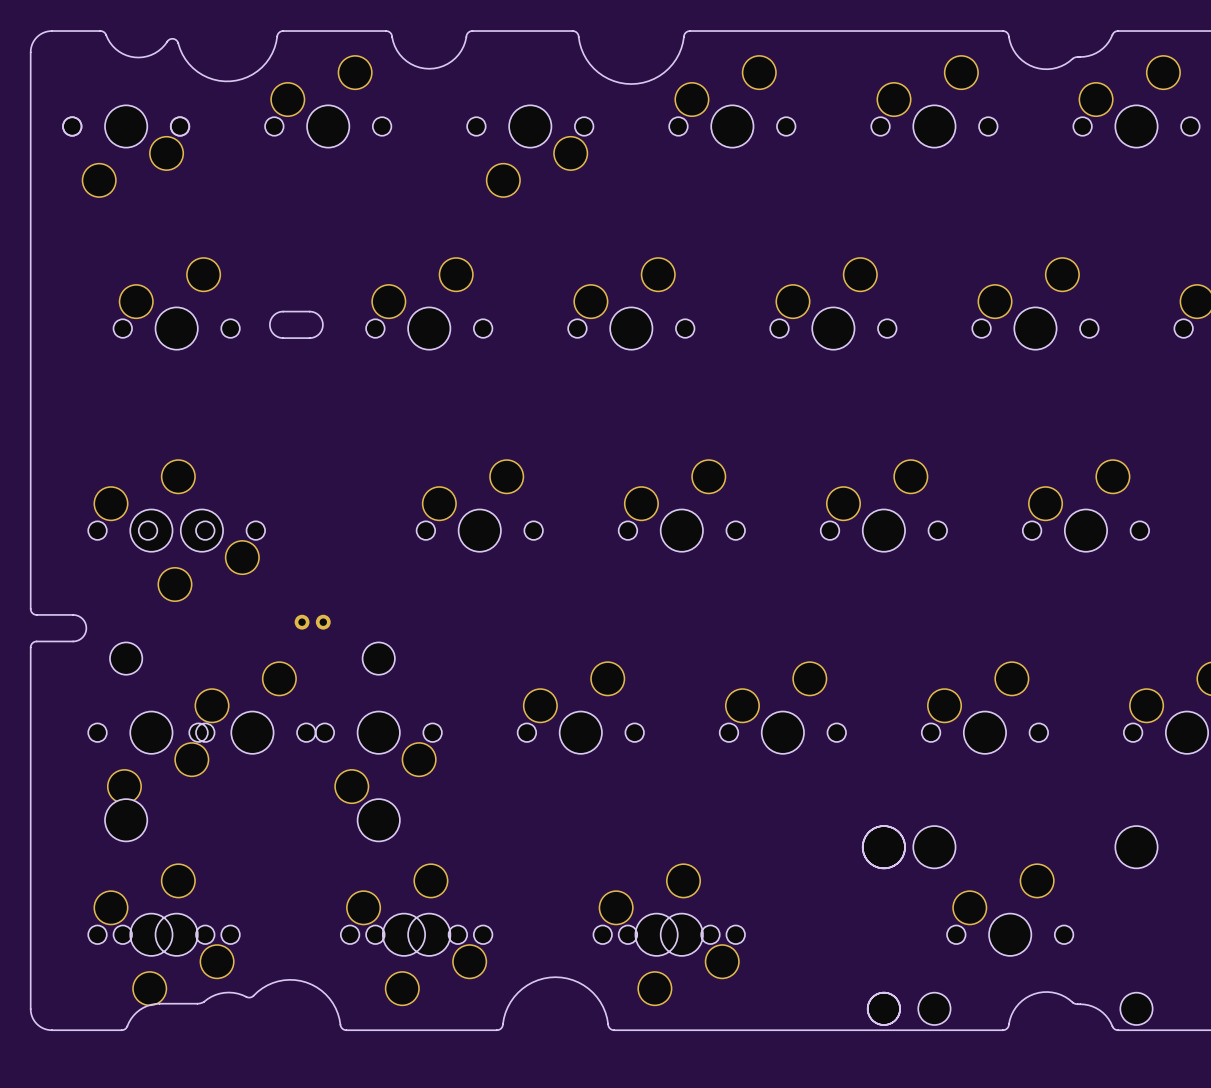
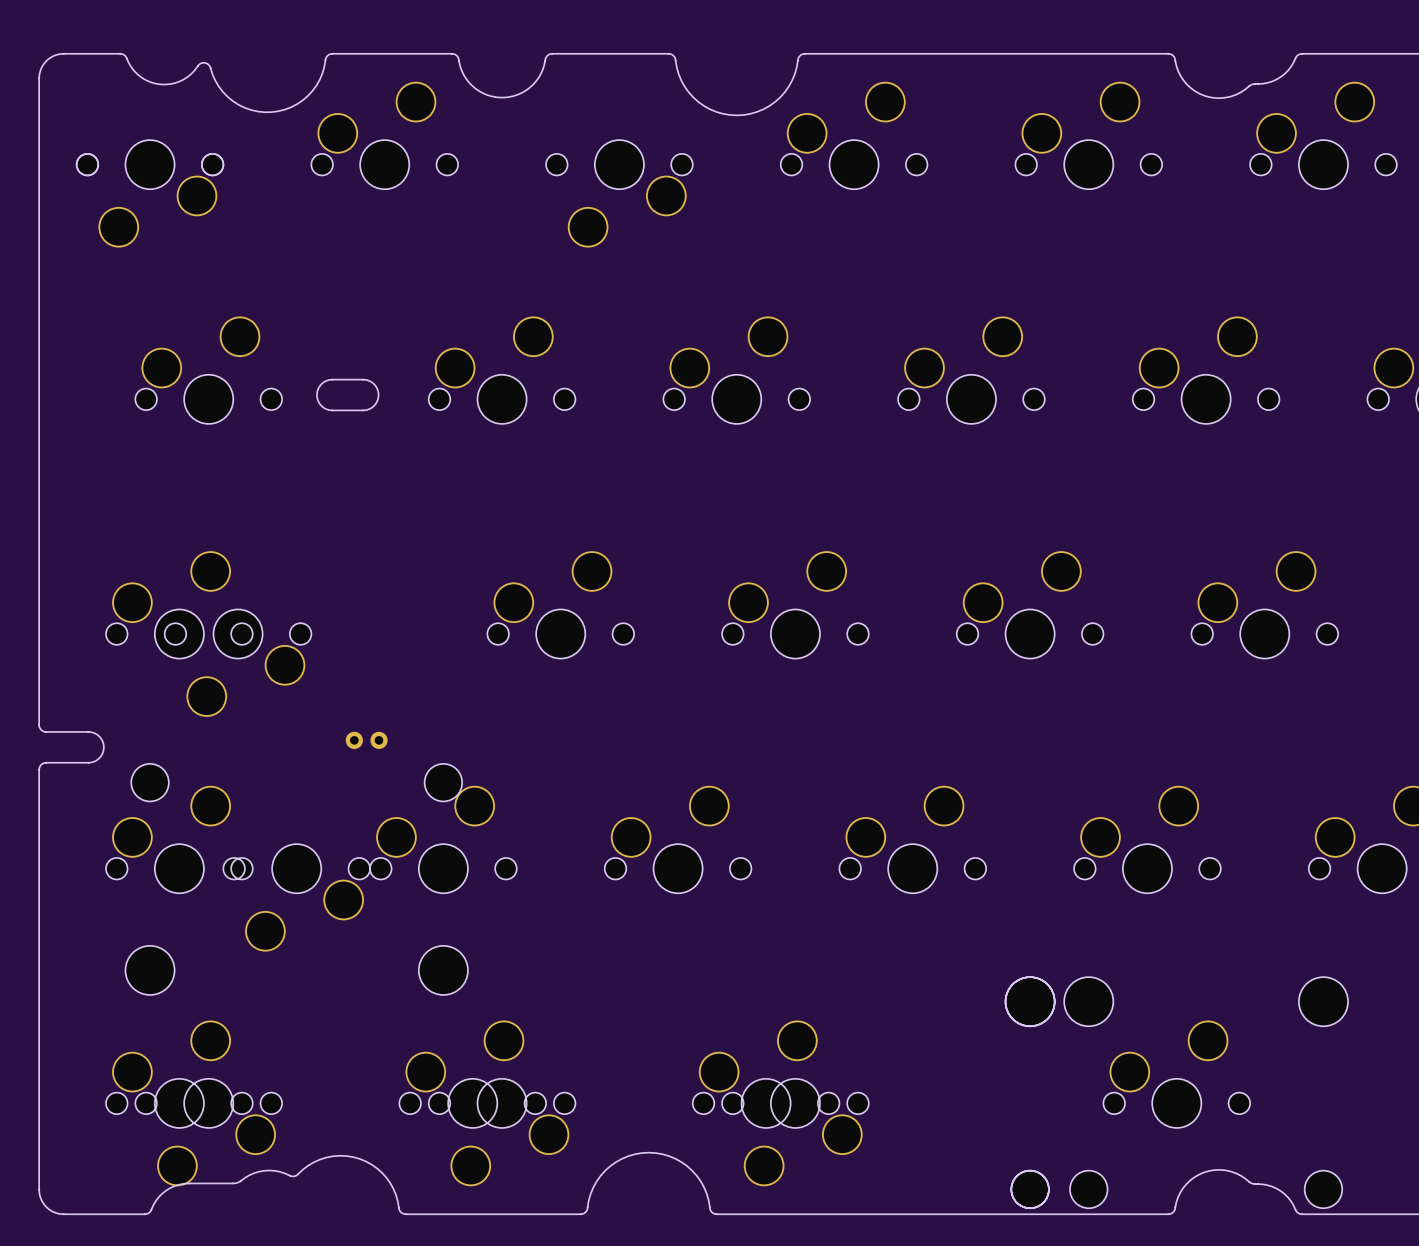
part rotation: 0° (252, 707) -> 180° (296, 897)
part rotation: 0° (151, 757) -> 180° (179, 839)
part rotation: 0° (378, 757) -> 180° (443, 839)

